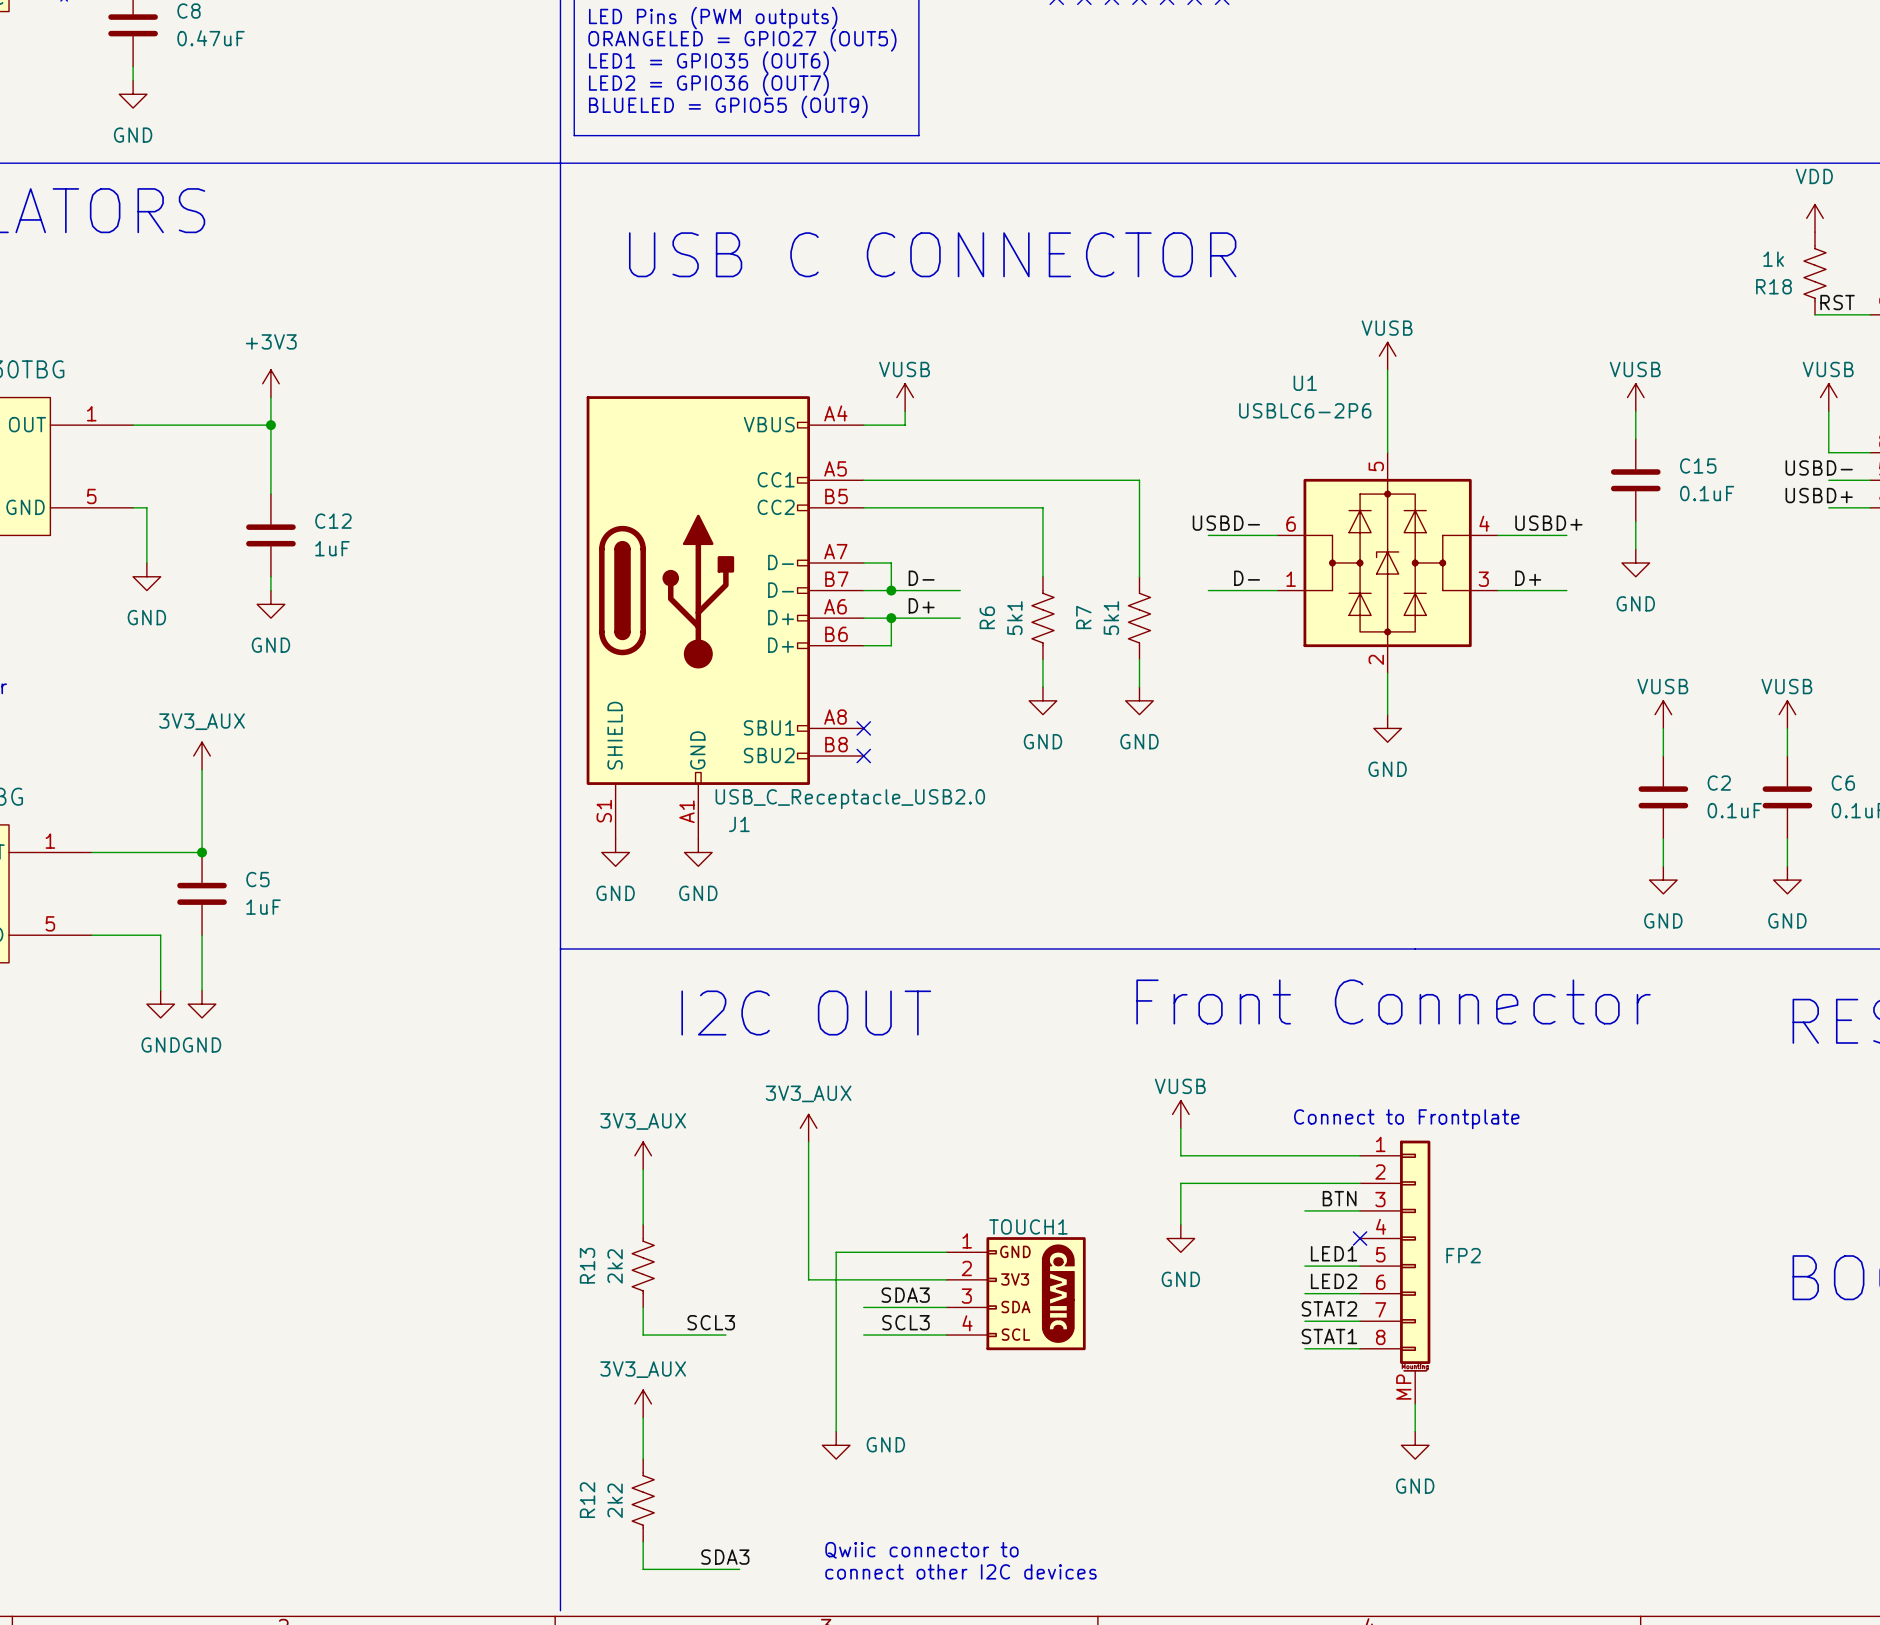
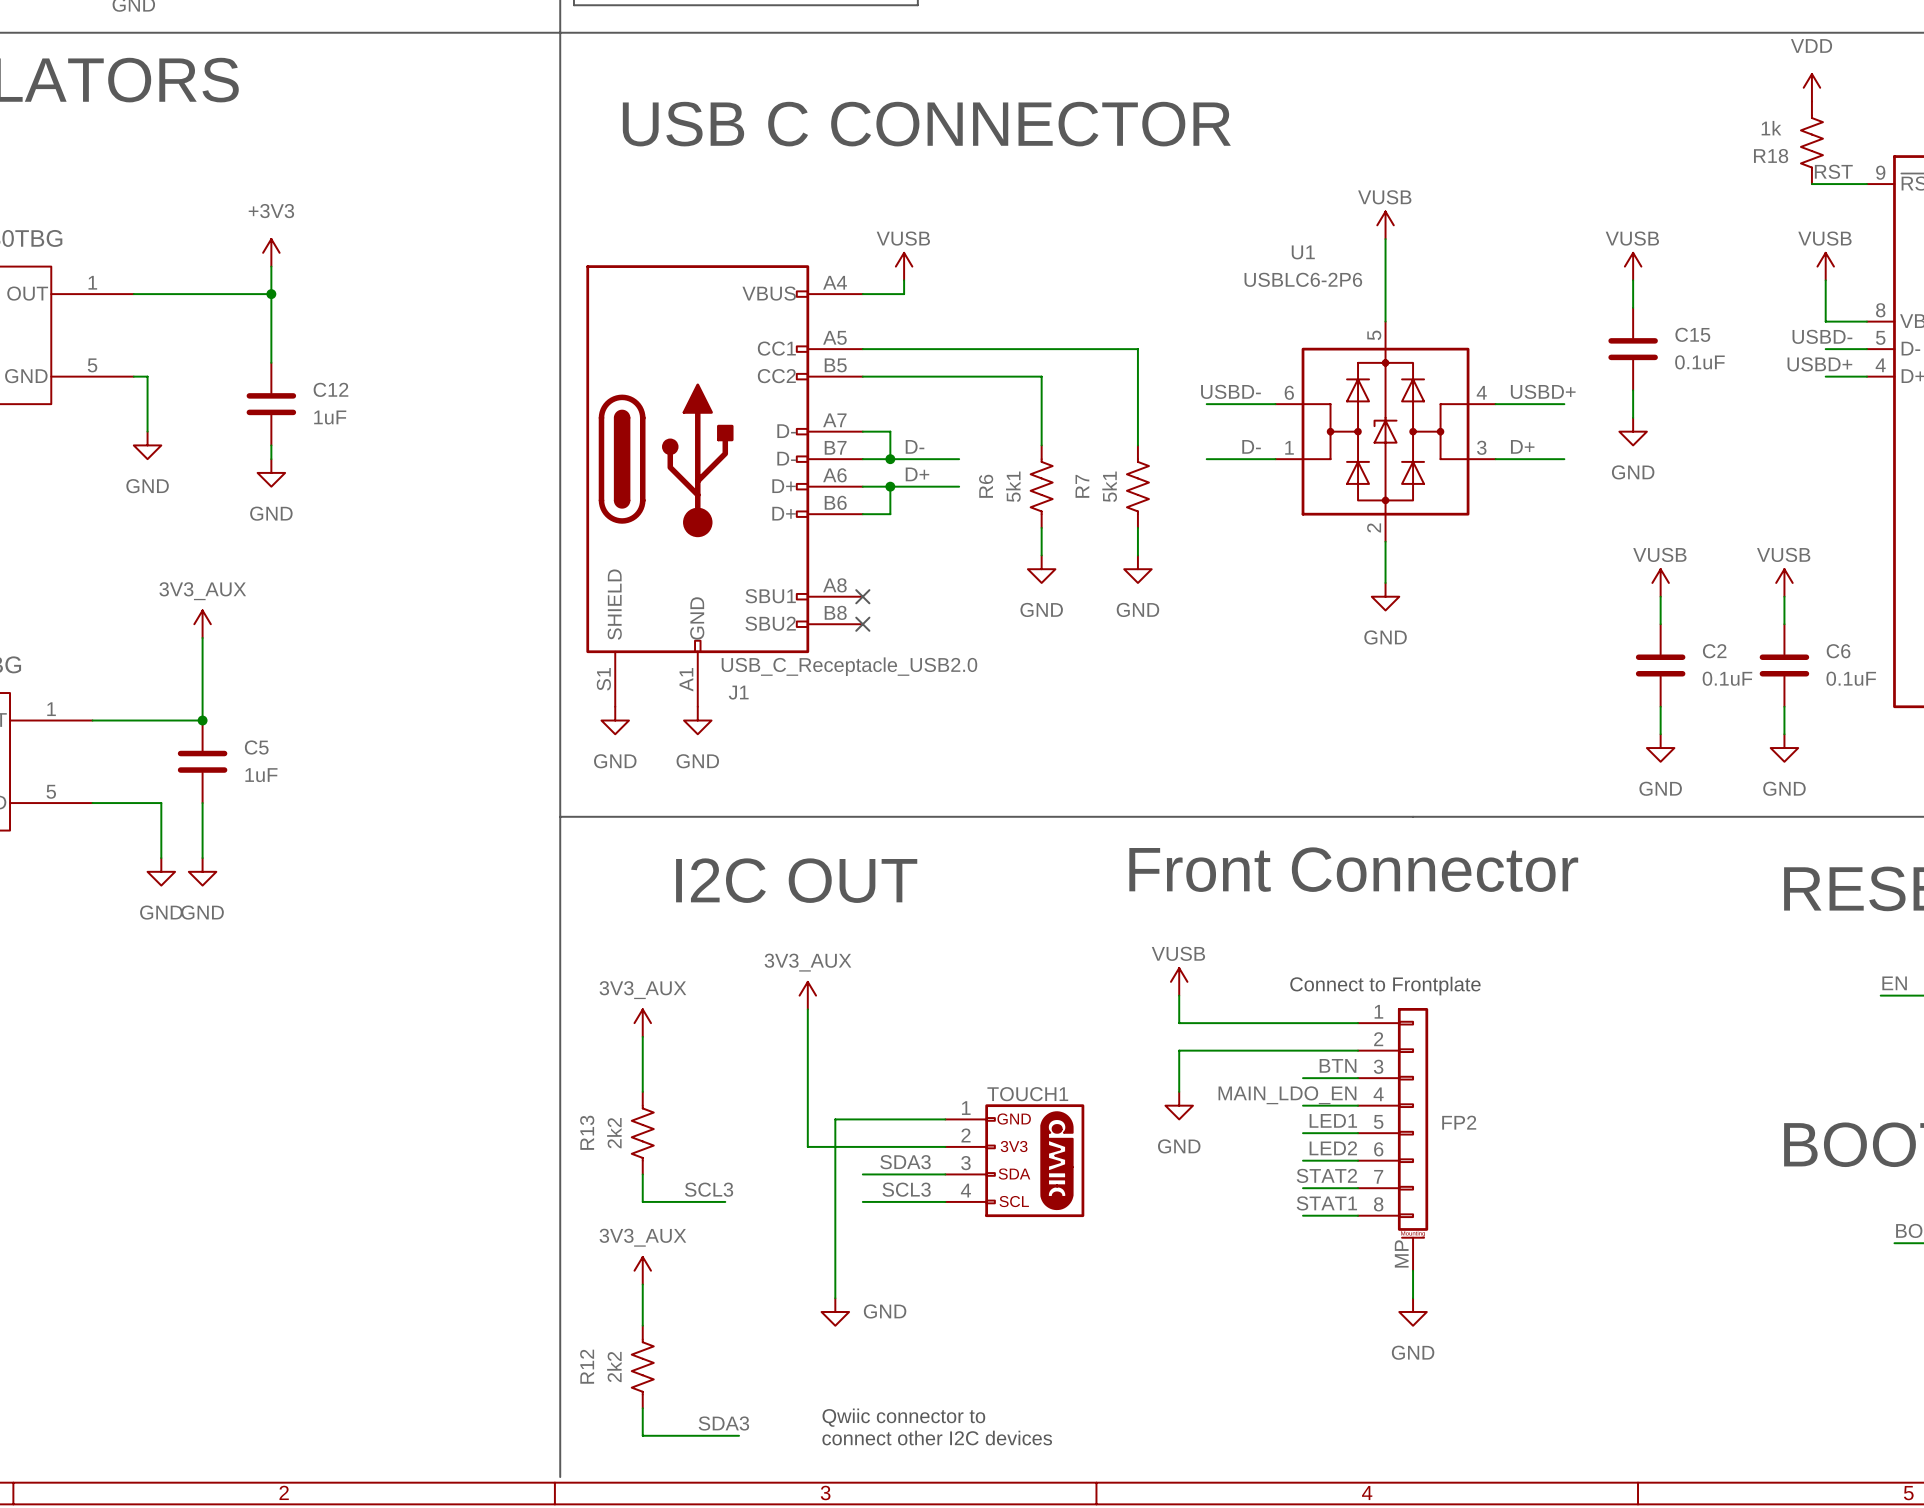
label: none -> MAIN_LDO_EN (1287, 1095)
wire: none -> (1303, 1105) (1358, 1105)
no-connect mark: (1360, 1238) -> none

